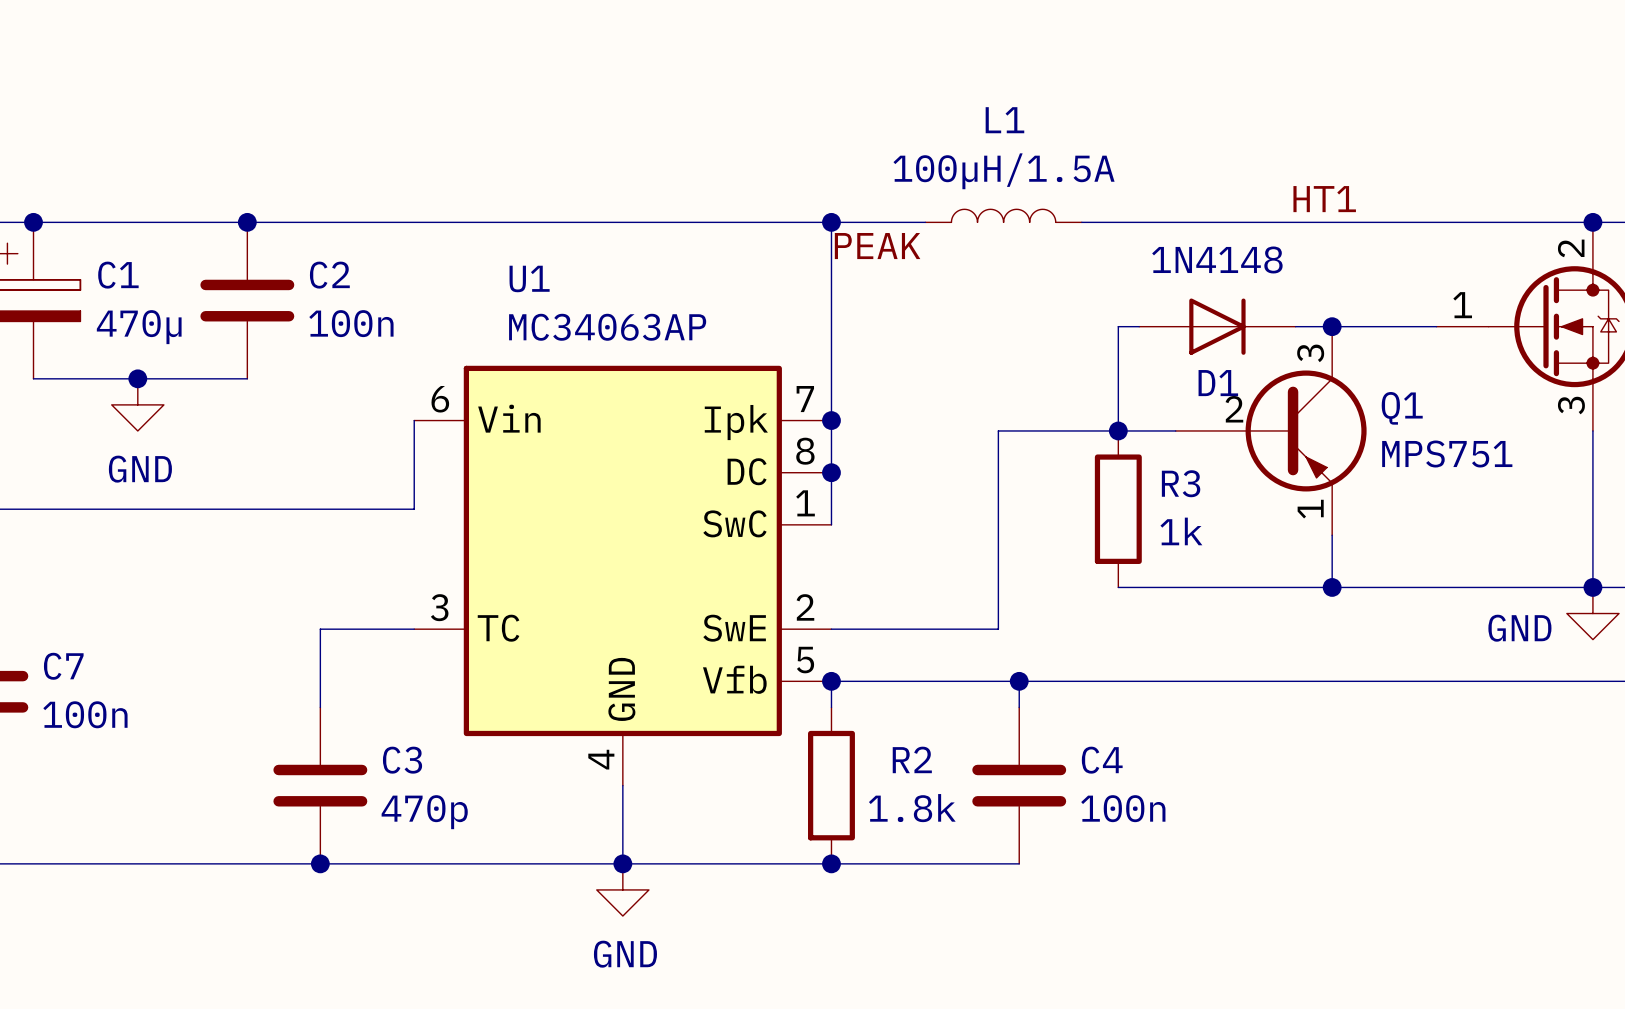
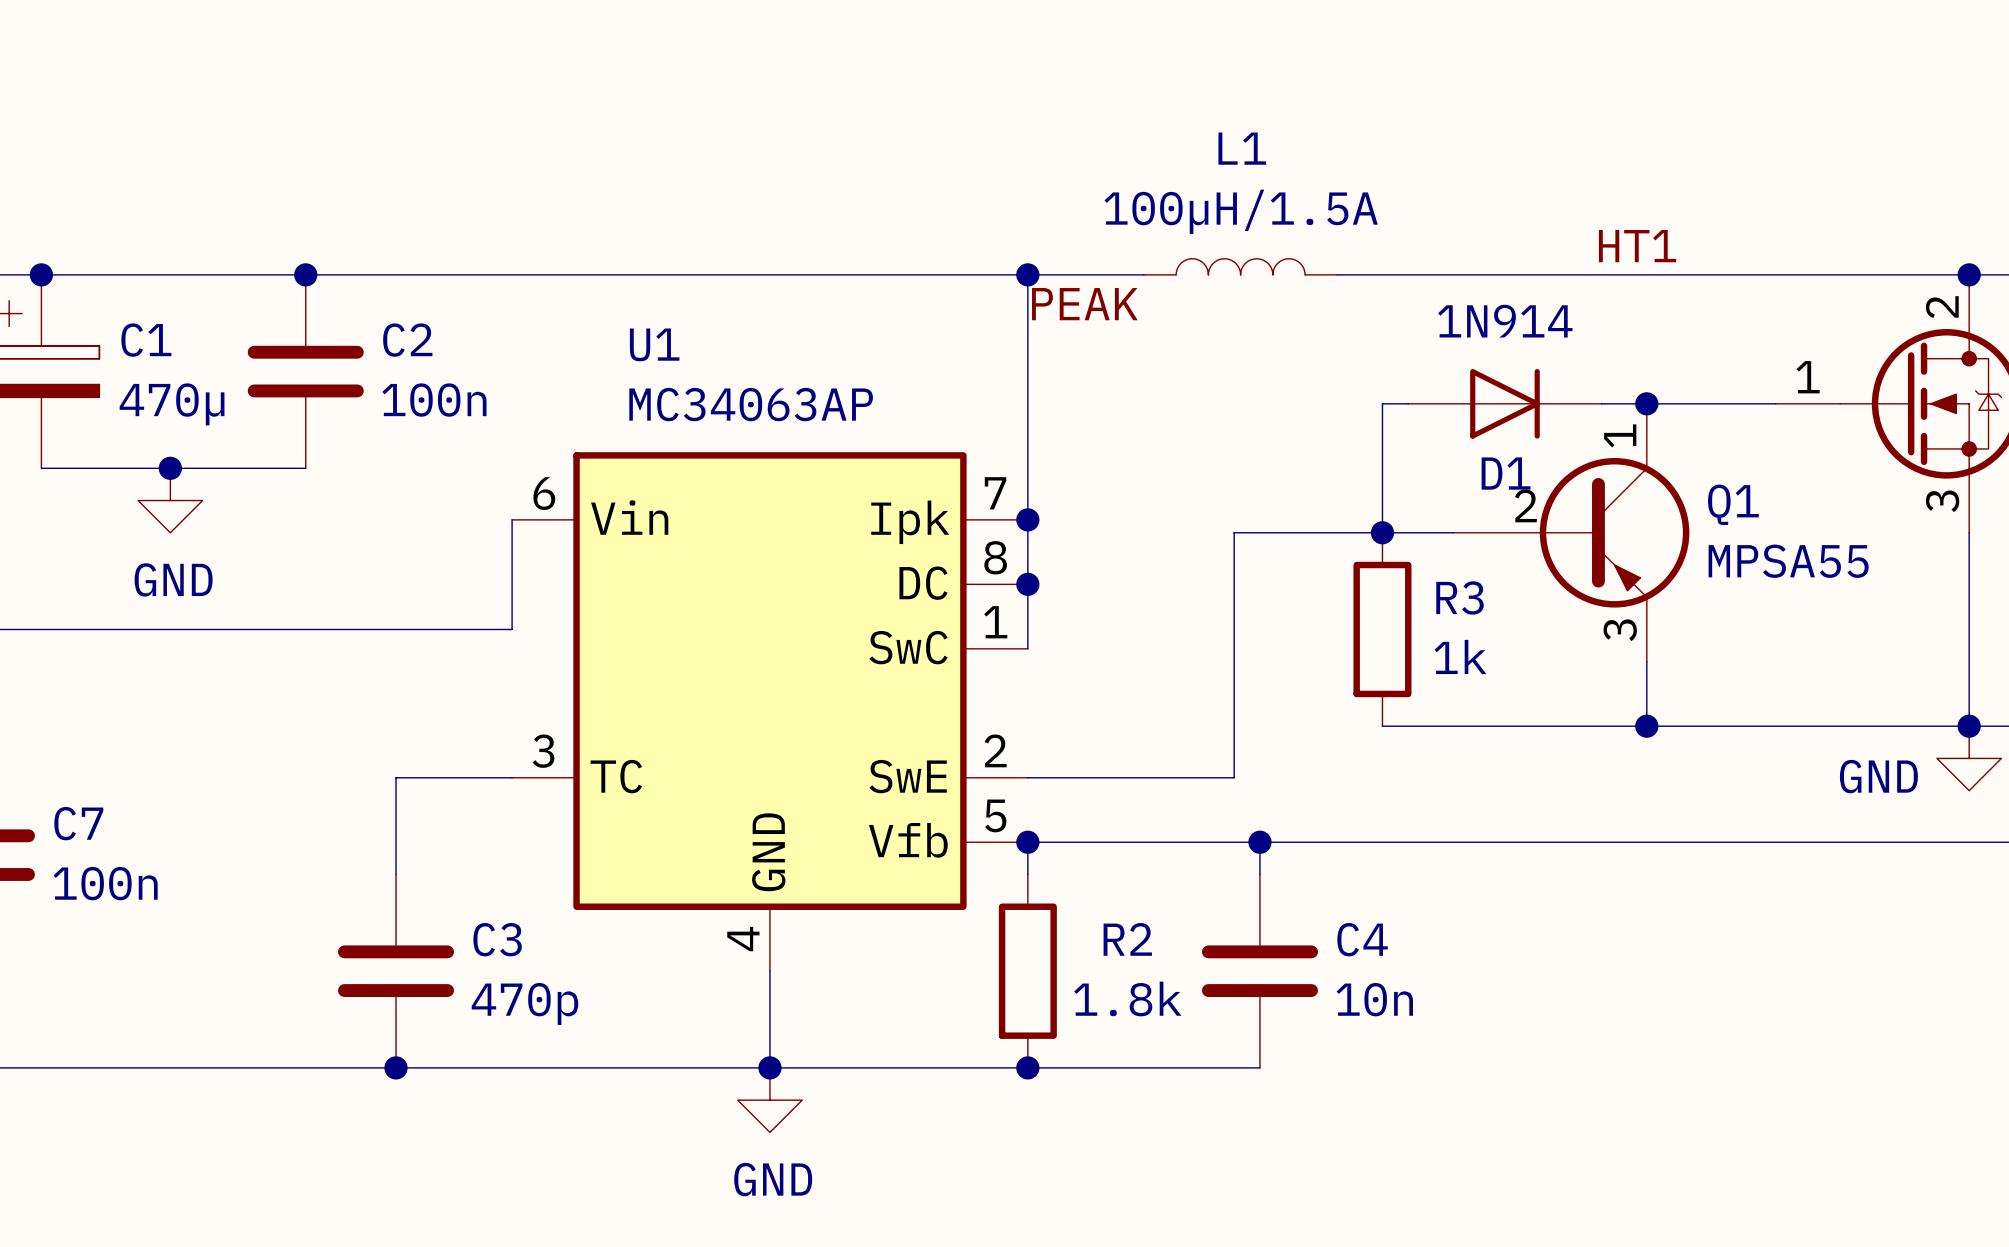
D1 value: 1N4148 (1217, 259) -> 1N914 (1505, 321)
Q1 pin number: 3 (1310, 353) -> 1 (1620, 435)
Q1 value: MPS751 (1447, 454) -> MPSA55 (1788, 561)
Q1 pin number: 1 (1310, 509) -> 3 (1620, 630)
C4 value: 100n (1123, 808) -> 10n (1374, 999)

